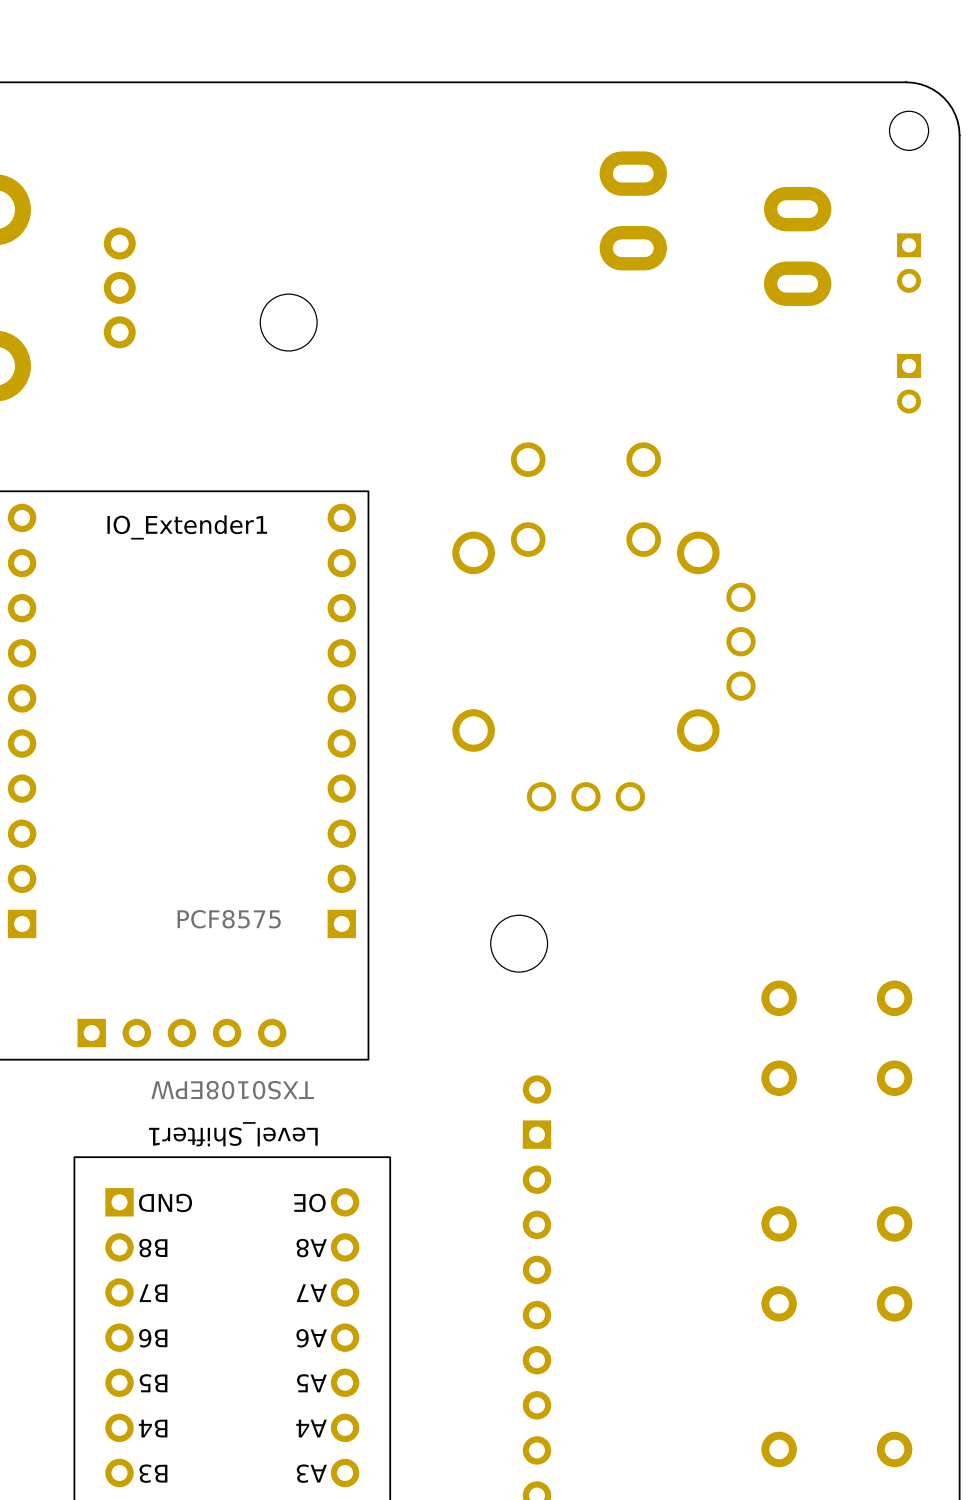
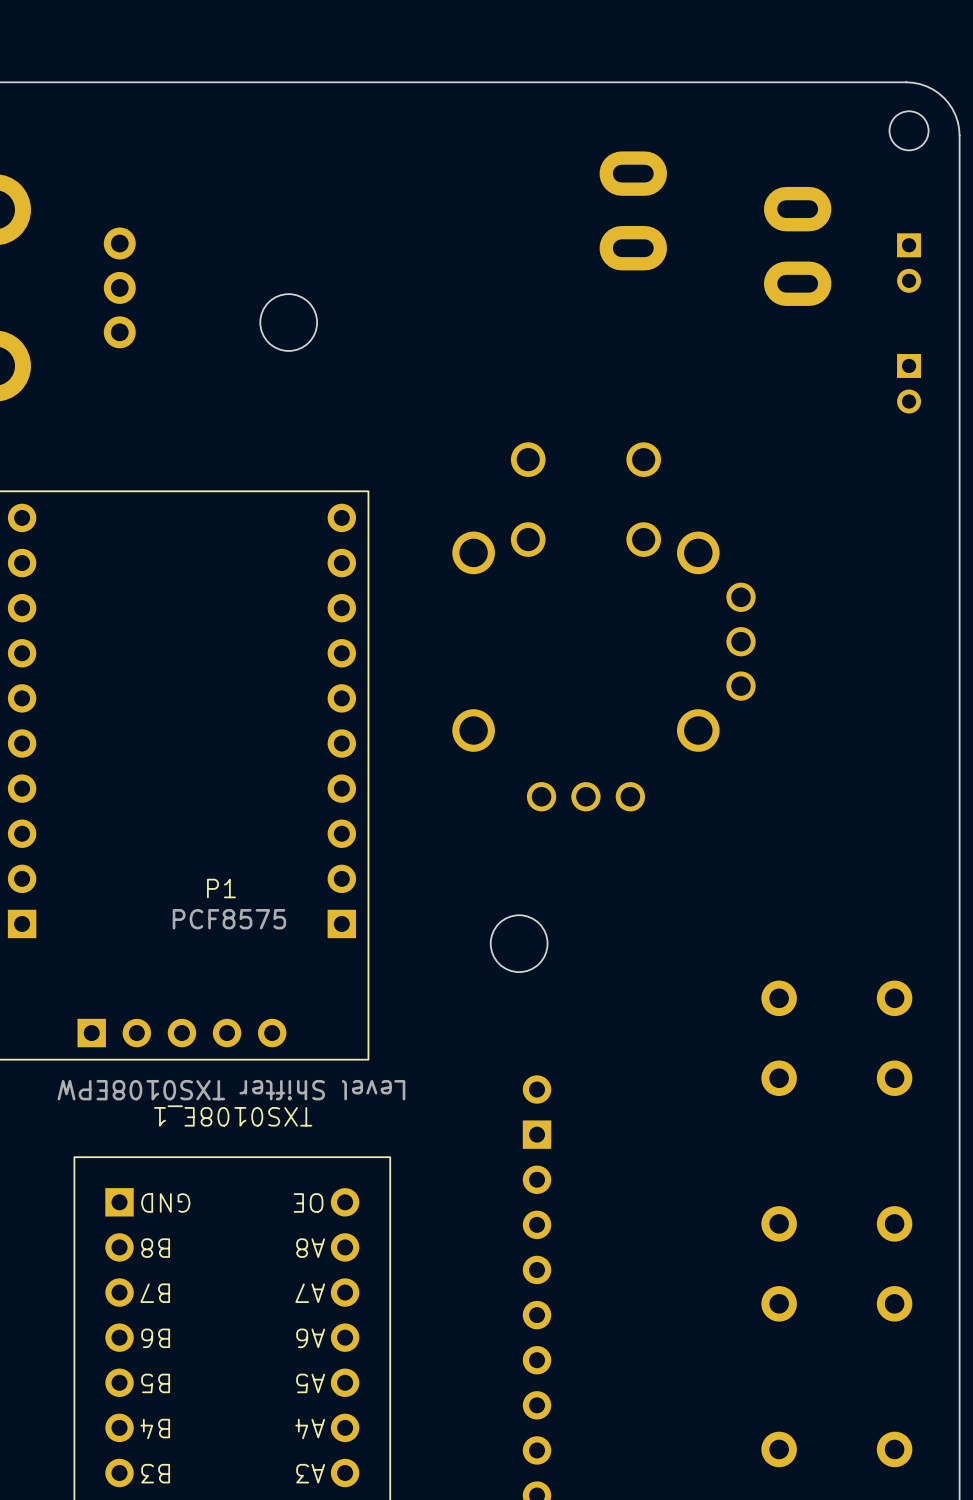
IO_Extender1 name: IO_Extender1 (187, 527) -> P1 (221, 888)
Level_Shifter1 value: TXS0108EPW (232, 1090) -> Level Shifter TXS0108EPW (231, 1090)
Level_Shifter1 name: Level_Shifter1 (233, 1134) -> TXS0108E_1 (233, 1115)

